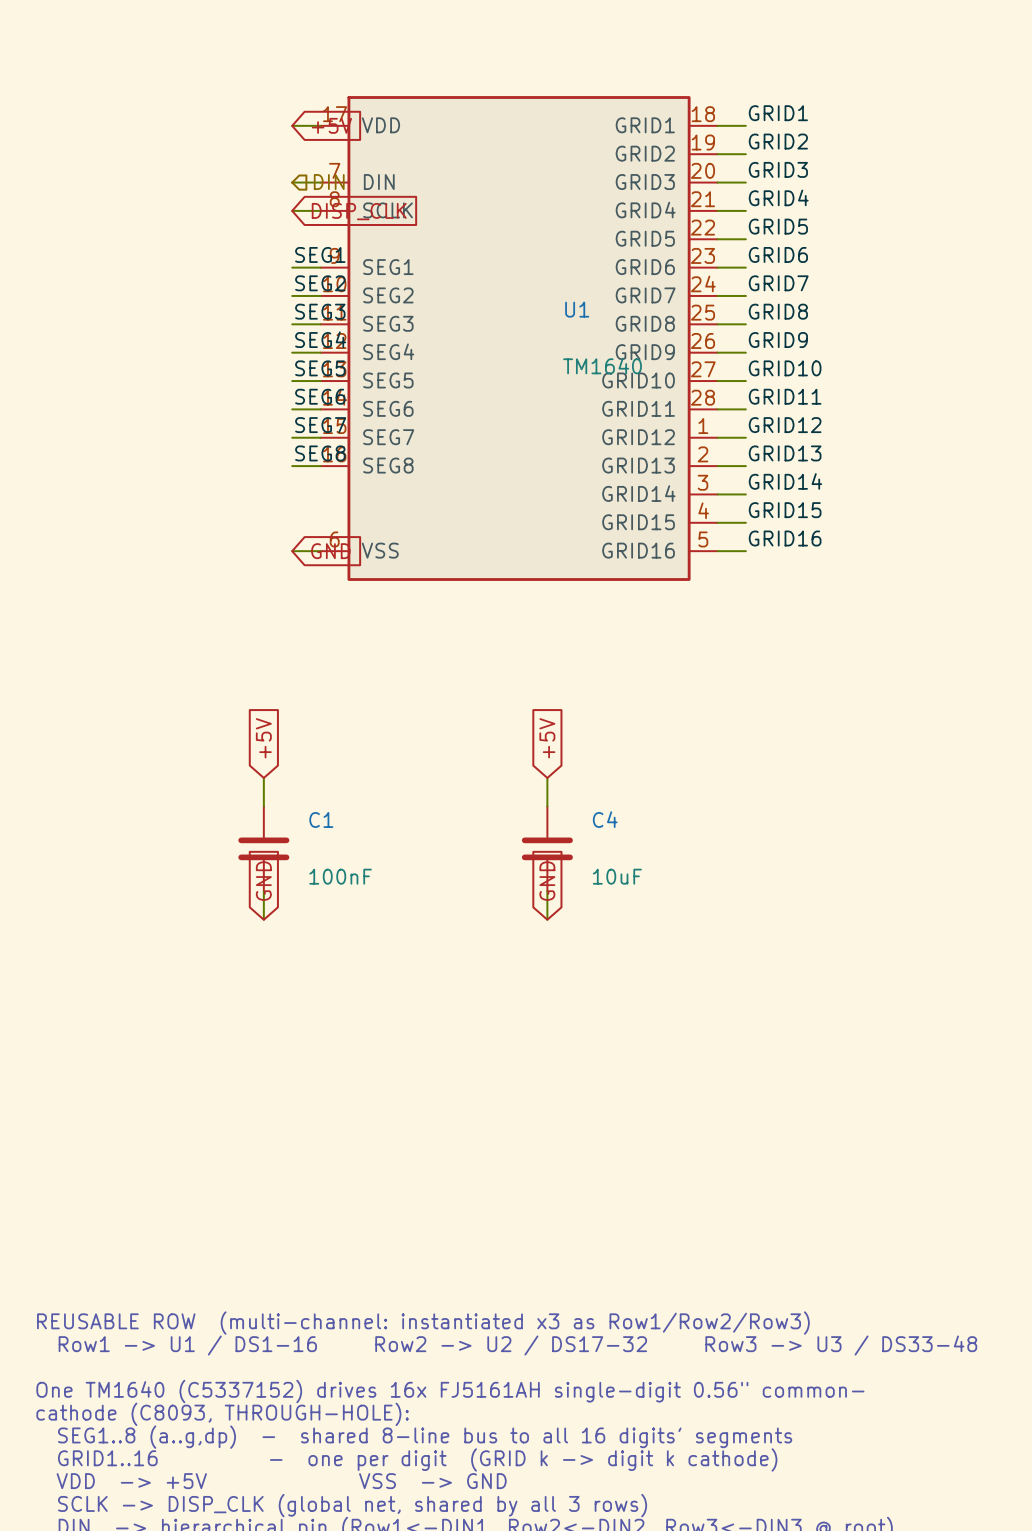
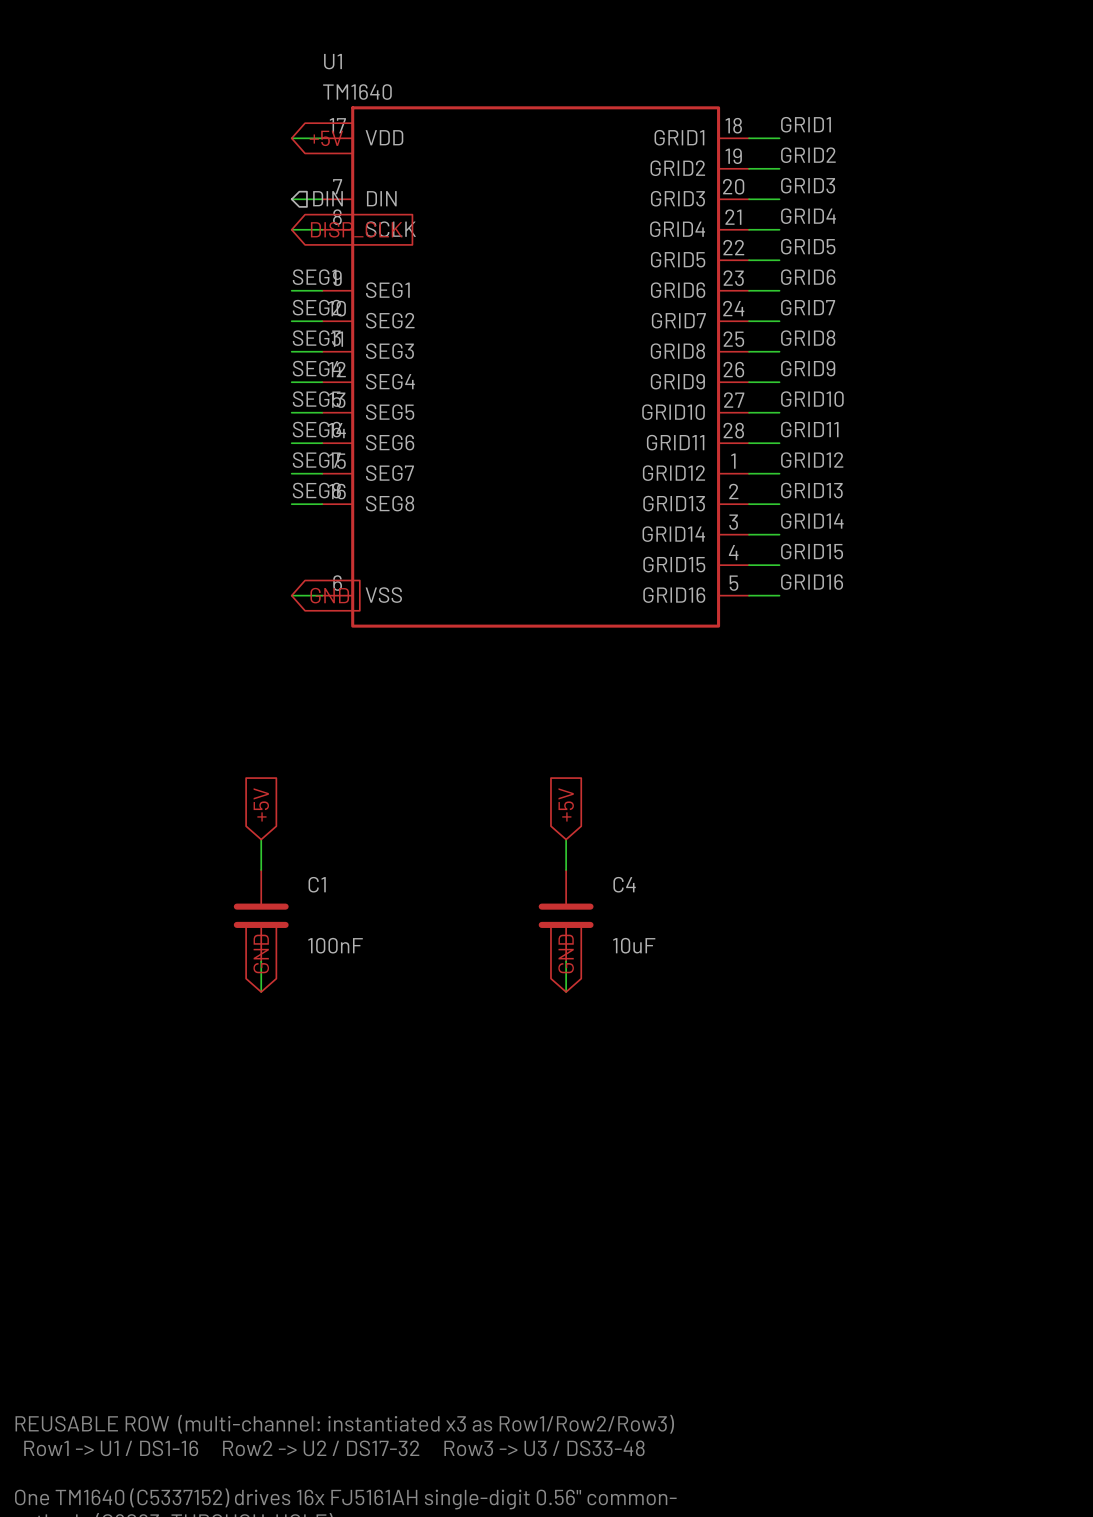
U1 name position: U1 (577, 309) -> U1 (333, 61)
U1 value position: TM1640 (602, 365) -> TM1640 (357, 92)

